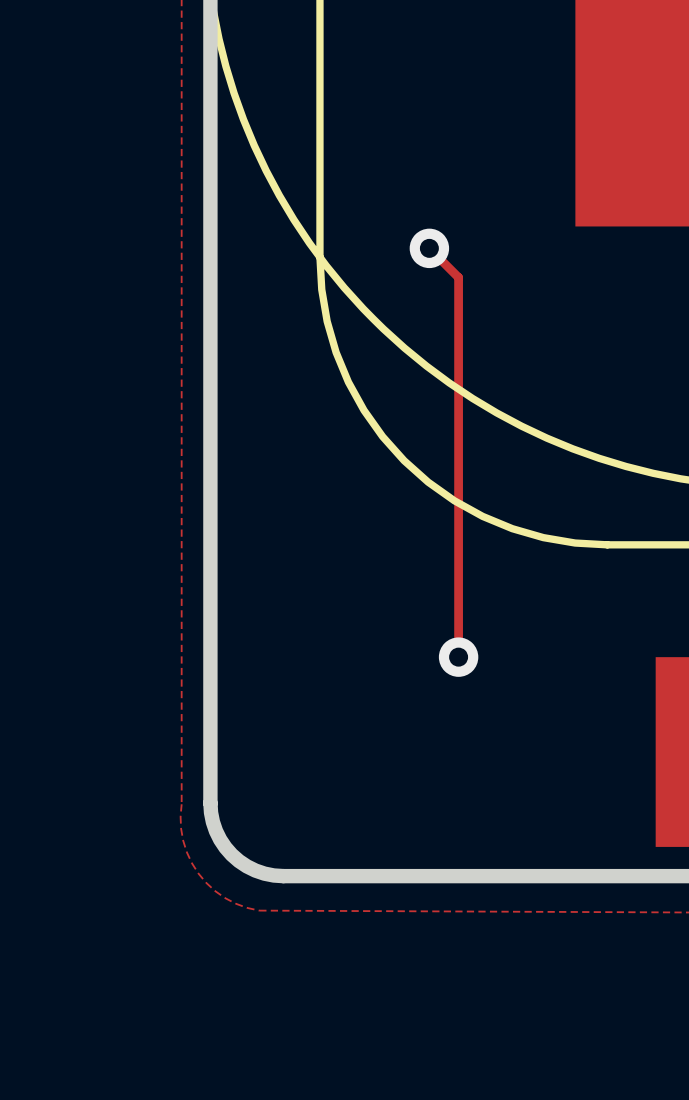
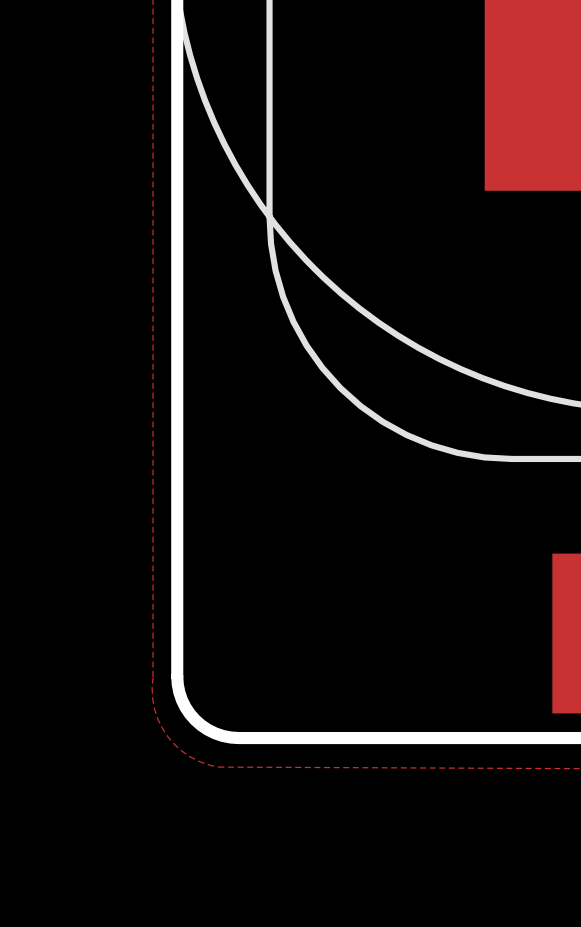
track: (429, 248) (458, 277) (458, 657) -> none
via: (429, 248) -> none
via: (458, 657) -> none

